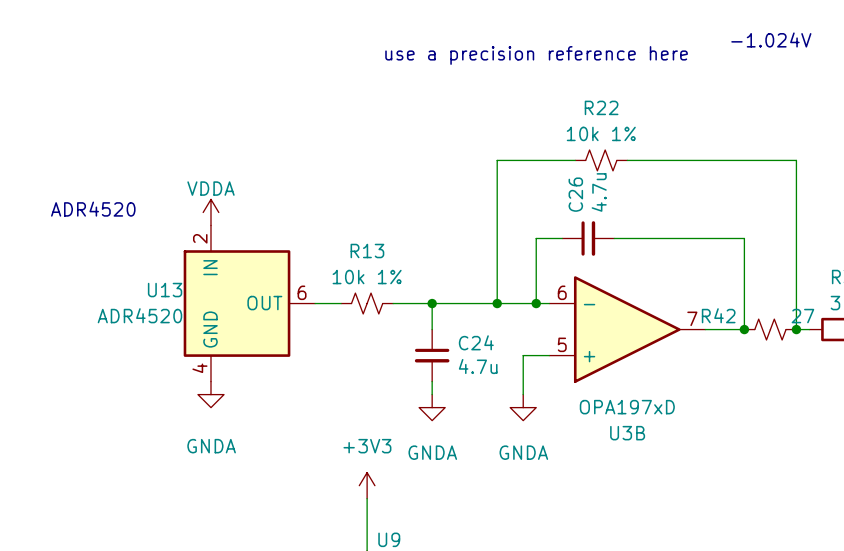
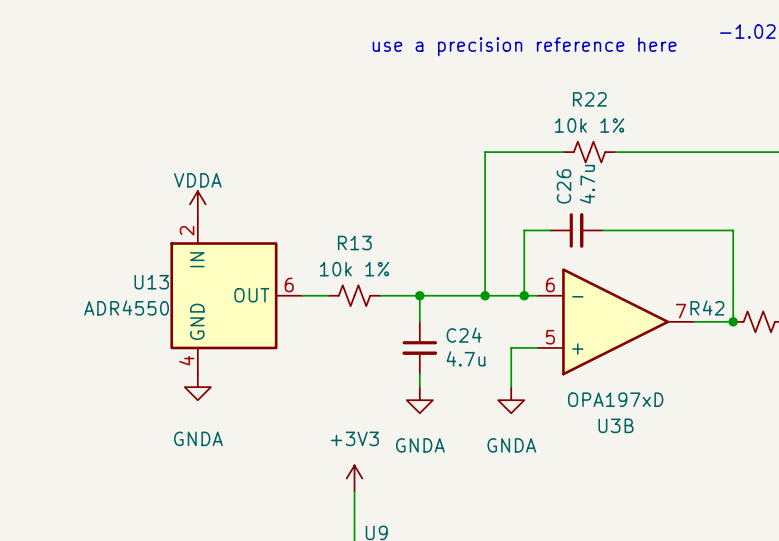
text: ADR4520 (93, 209) -> none
U13 value: ADR4520 (139, 315) -> ADR4550 (126, 308)

